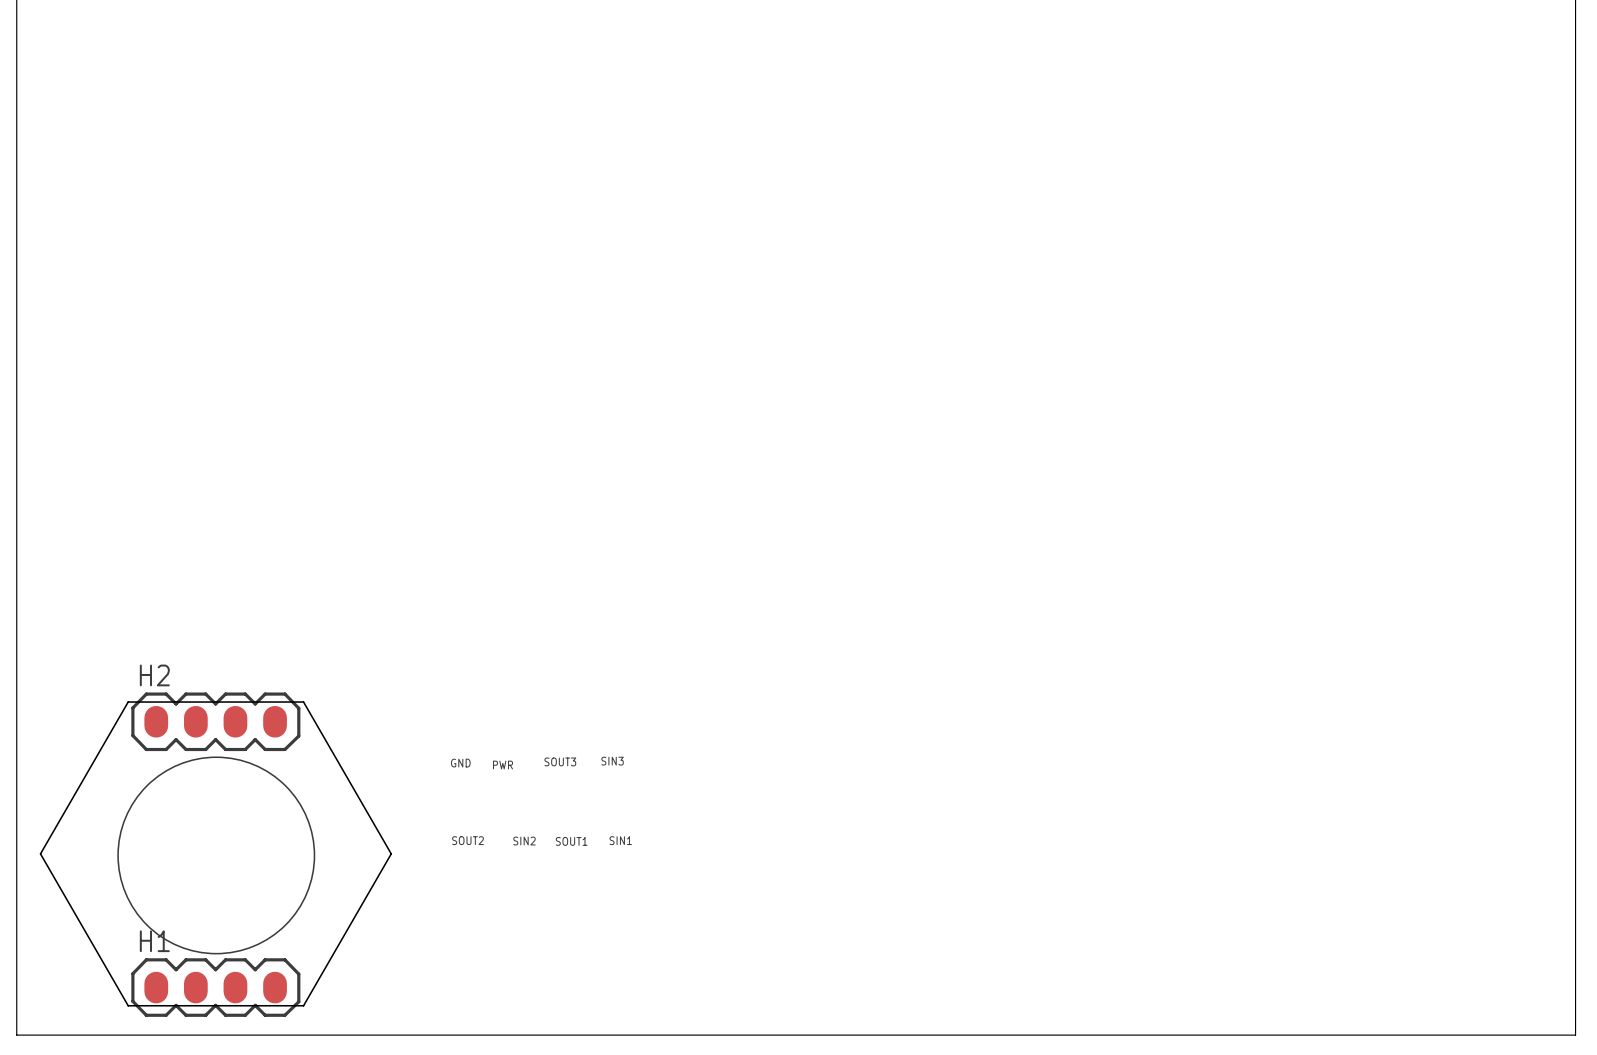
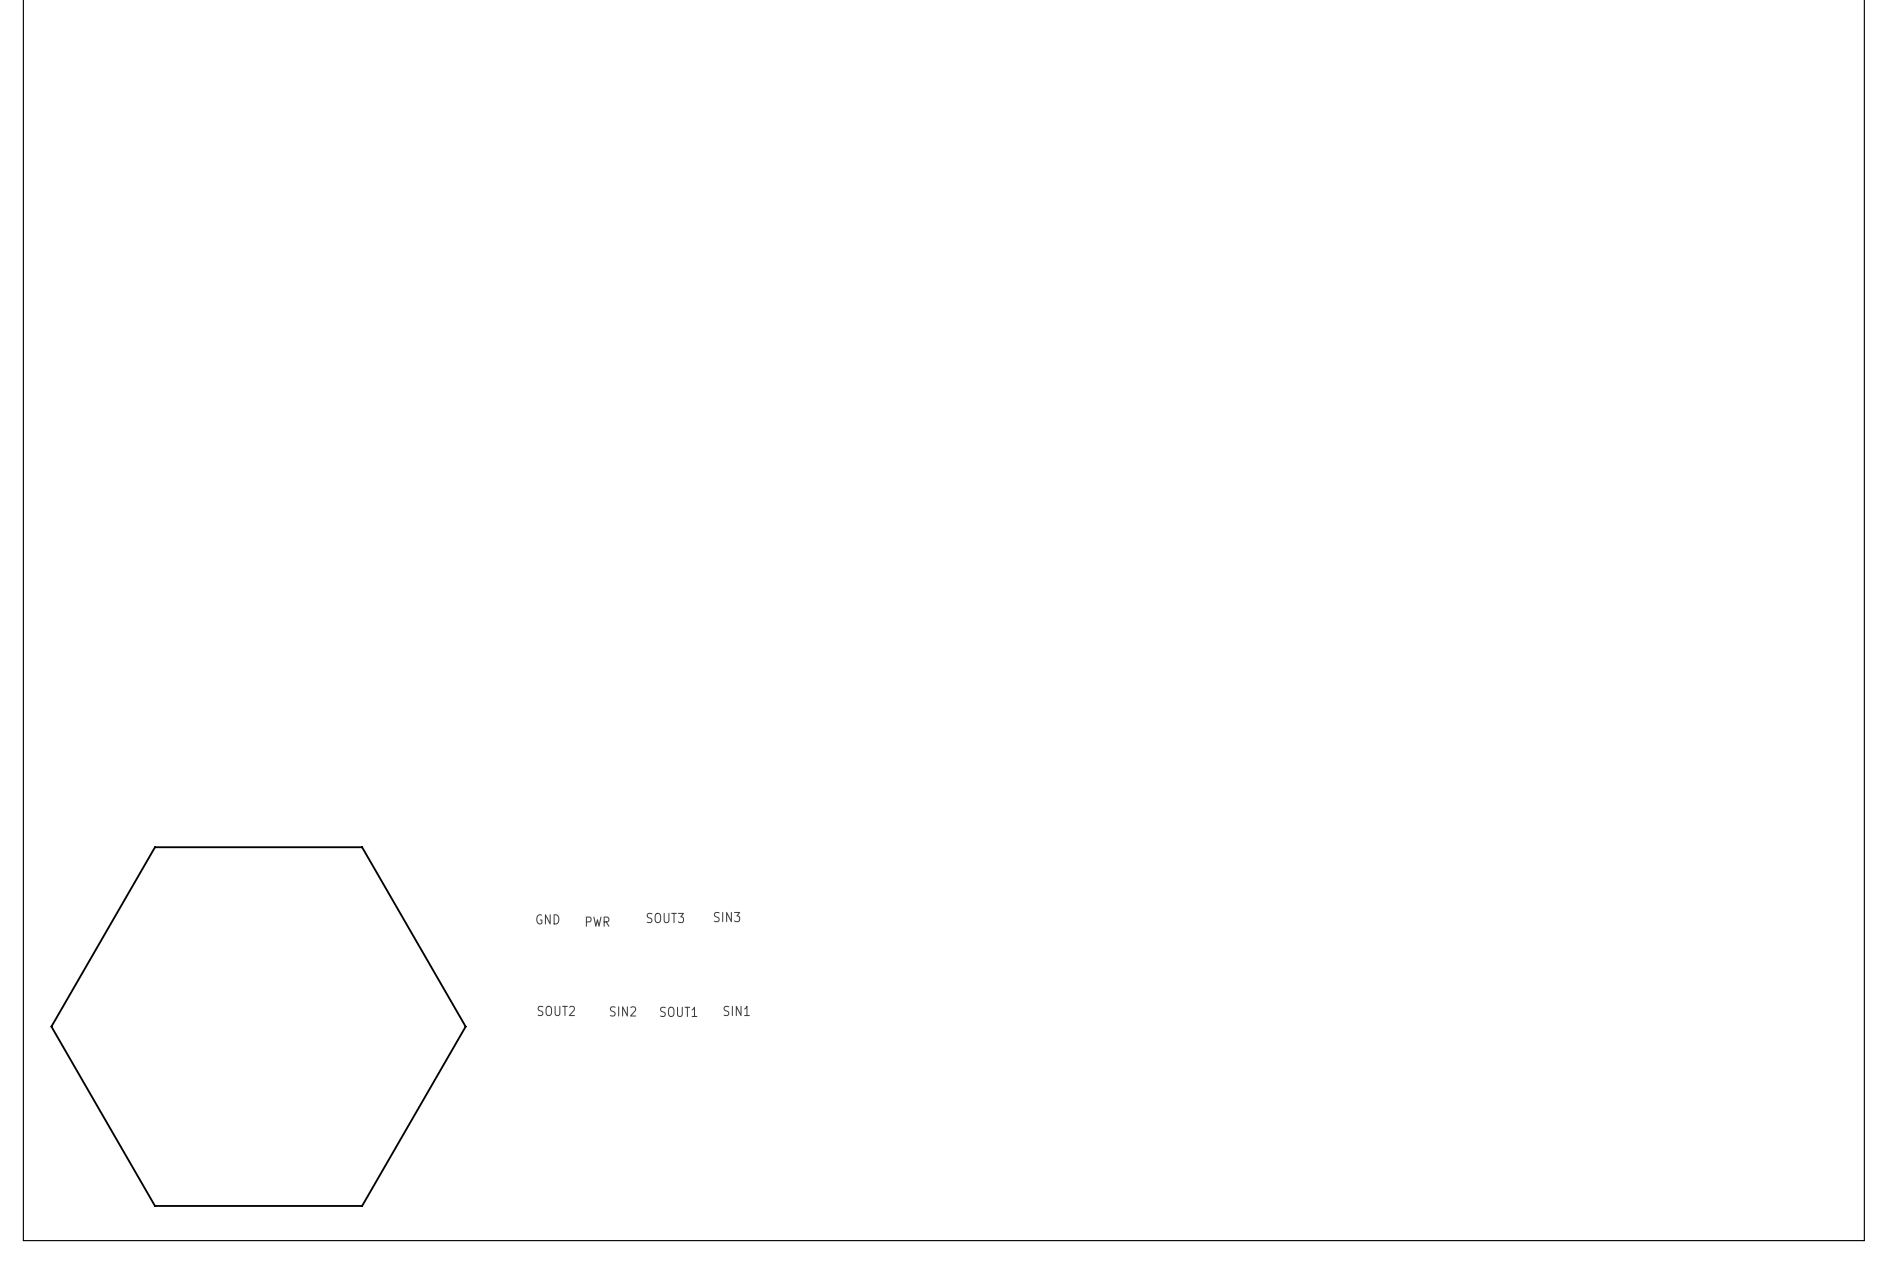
H2: (215, 721) -> none
drawing: [117, 756, 316, 955] -> none
H1: (215, 987) -> none

